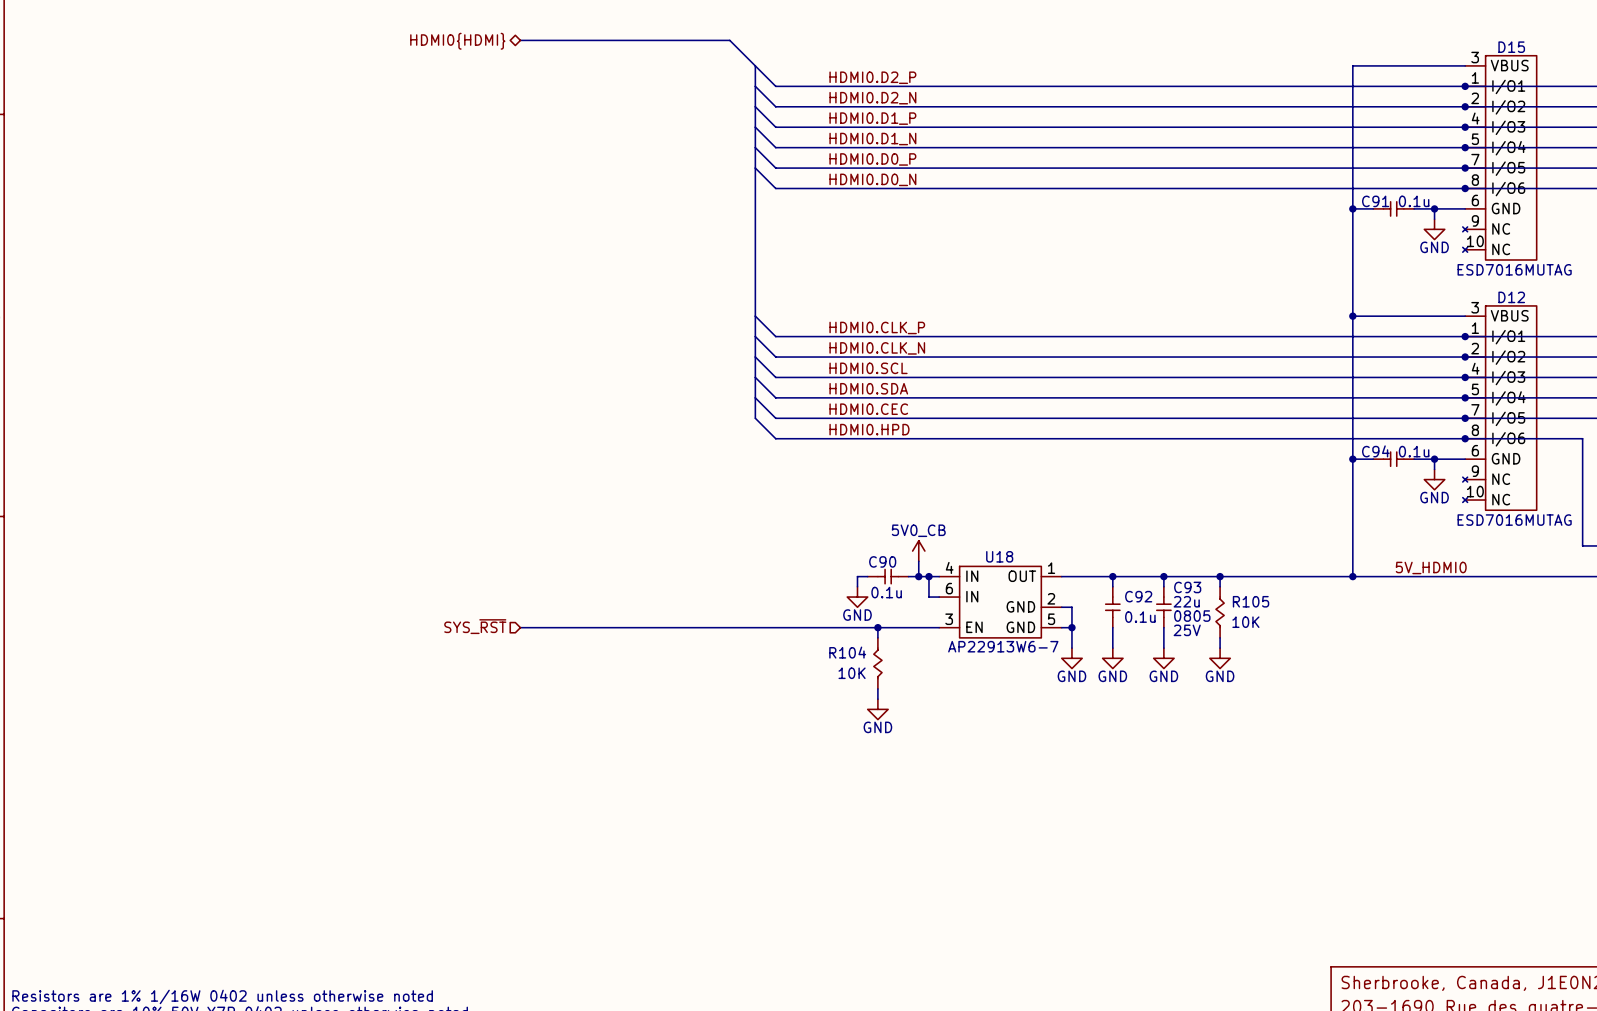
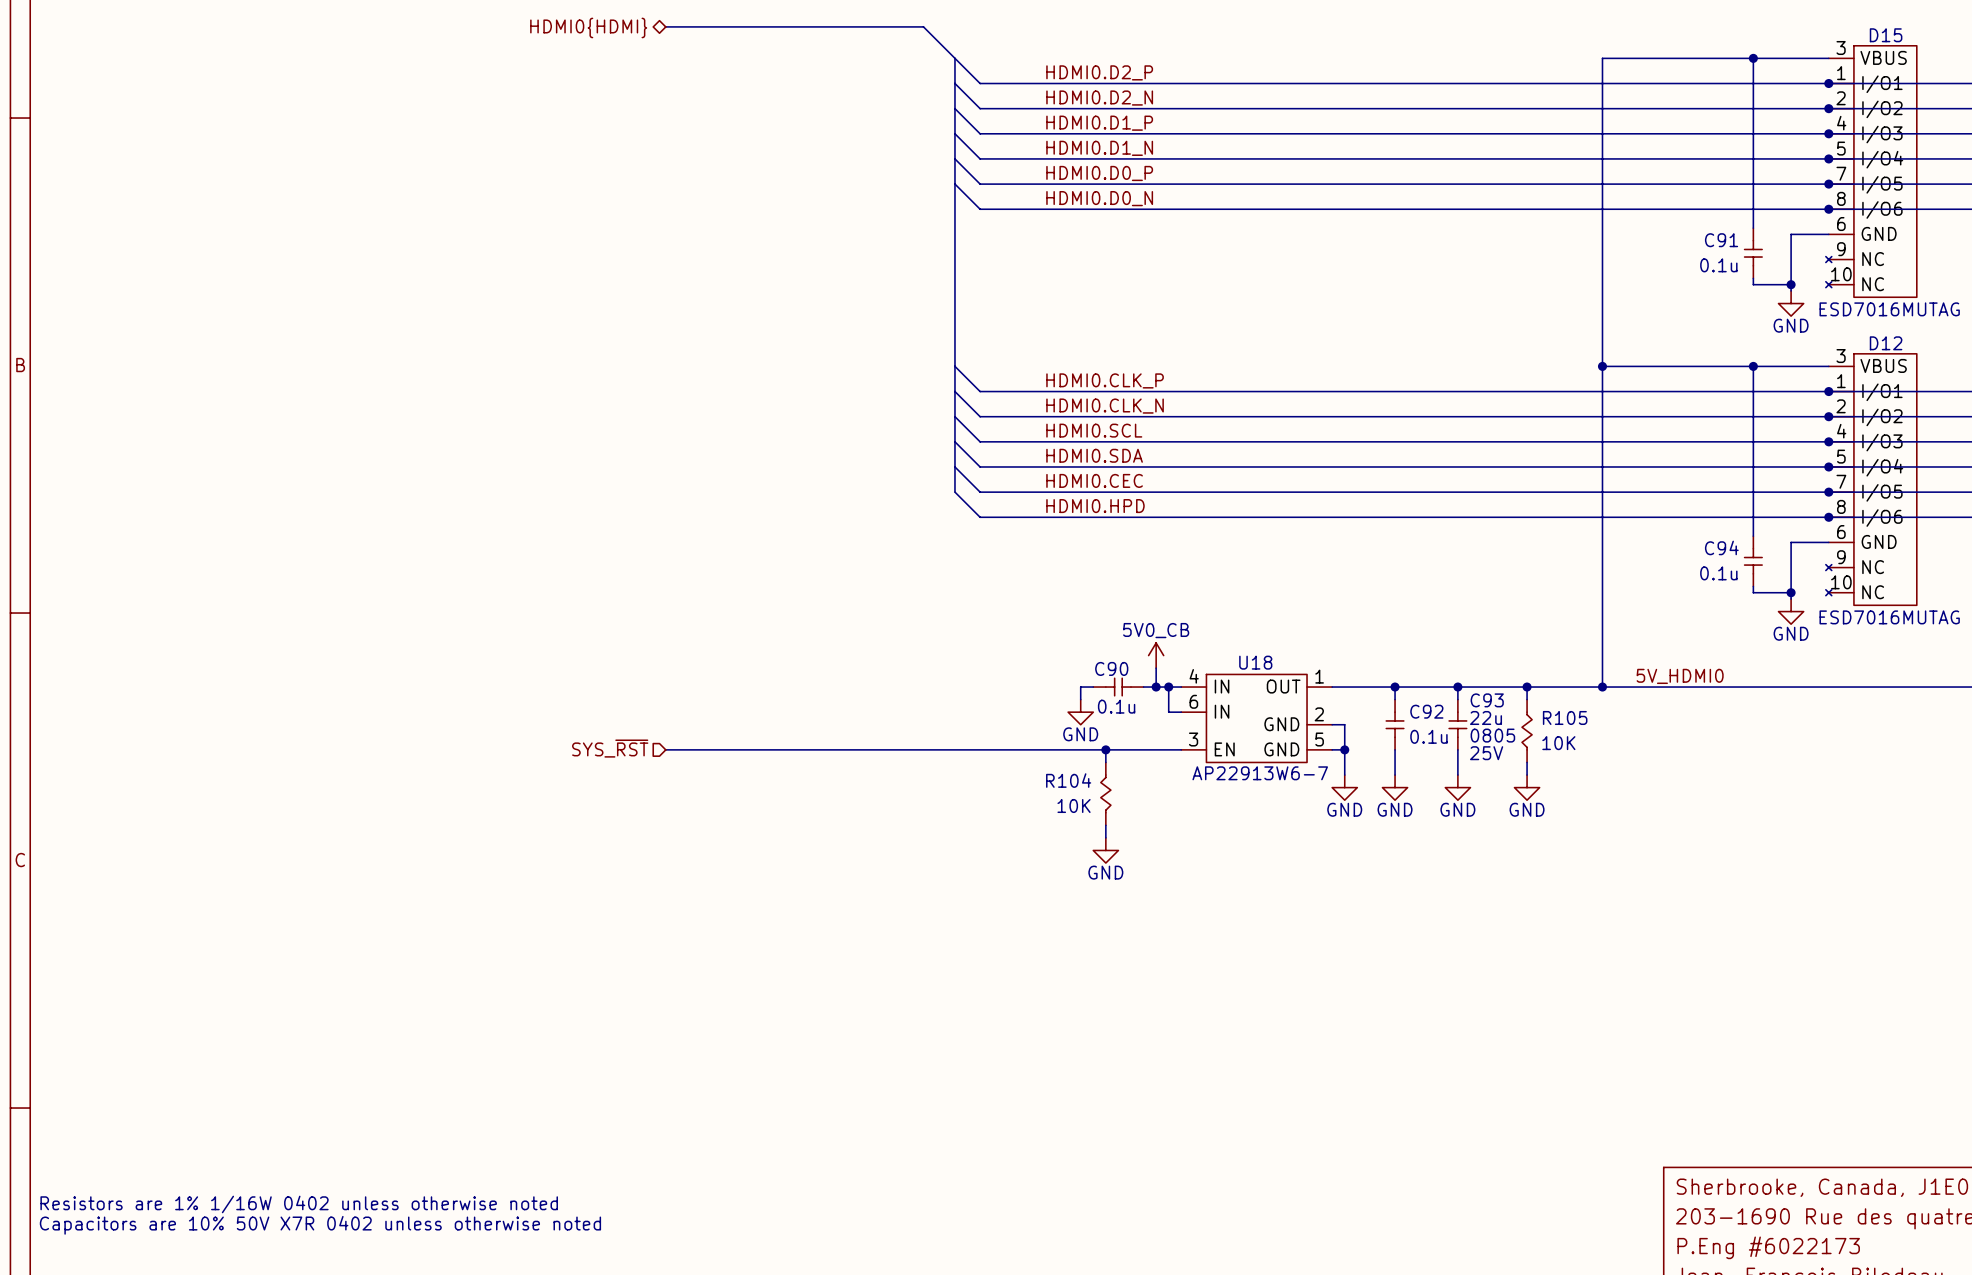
wire: (1352, 65) (1352, 576) -> (1690, 58) (1602, 58) (1602, 687)
wire: none -> (1753, 58) (1753, 228)
junction: none -> (1753, 58)
C91 value position: 0.1u (1414, 201) -> 0.1u (1718, 265)
wire: (1352, 208) (1373, 208) -> none
junction: (1352, 208) -> none
C91 rotation: 0° (1393, 208) -> 90° clockwise (1753, 253)
wire: (1414, 208) (1434, 208) -> none
junction position: (1434, 208) -> (1791, 284)
wire: none -> (1791, 246) (1791, 290)
power symbol position: GND (1434, 229) -> GND (1791, 303)
wire: none -> (1753, 278) (1753, 284) (1791, 284)
wire: none -> (1602, 366) (1690, 366)
junction: none -> (1602, 366)
junction: (1352, 316) -> none
wire: none -> (1753, 366) (1753, 536)
junction: none -> (1753, 366)
C94 value position: 0.1u (1414, 451) -> 0.1u (1718, 573)
wire: (1352, 459) (1373, 459) -> none
junction: (1352, 459) -> none
C94 rotation: 0° (1393, 459) -> 90° clockwise (1753, 561)
wire: (1414, 459) (1434, 459) -> none
junction position: (1434, 459) -> (1791, 592)
wire: none -> (1791, 555) (1791, 599)
power symbol position: GND (1434, 479) -> GND (1791, 611)
wire: none -> (1753, 586) (1753, 592) (1791, 592)
label position: 5V_HDMI0 (1431, 567) -> 5V_HDMI0 (1680, 676)
junction: none -> (1602, 687)
junction: (1352, 576) -> none

